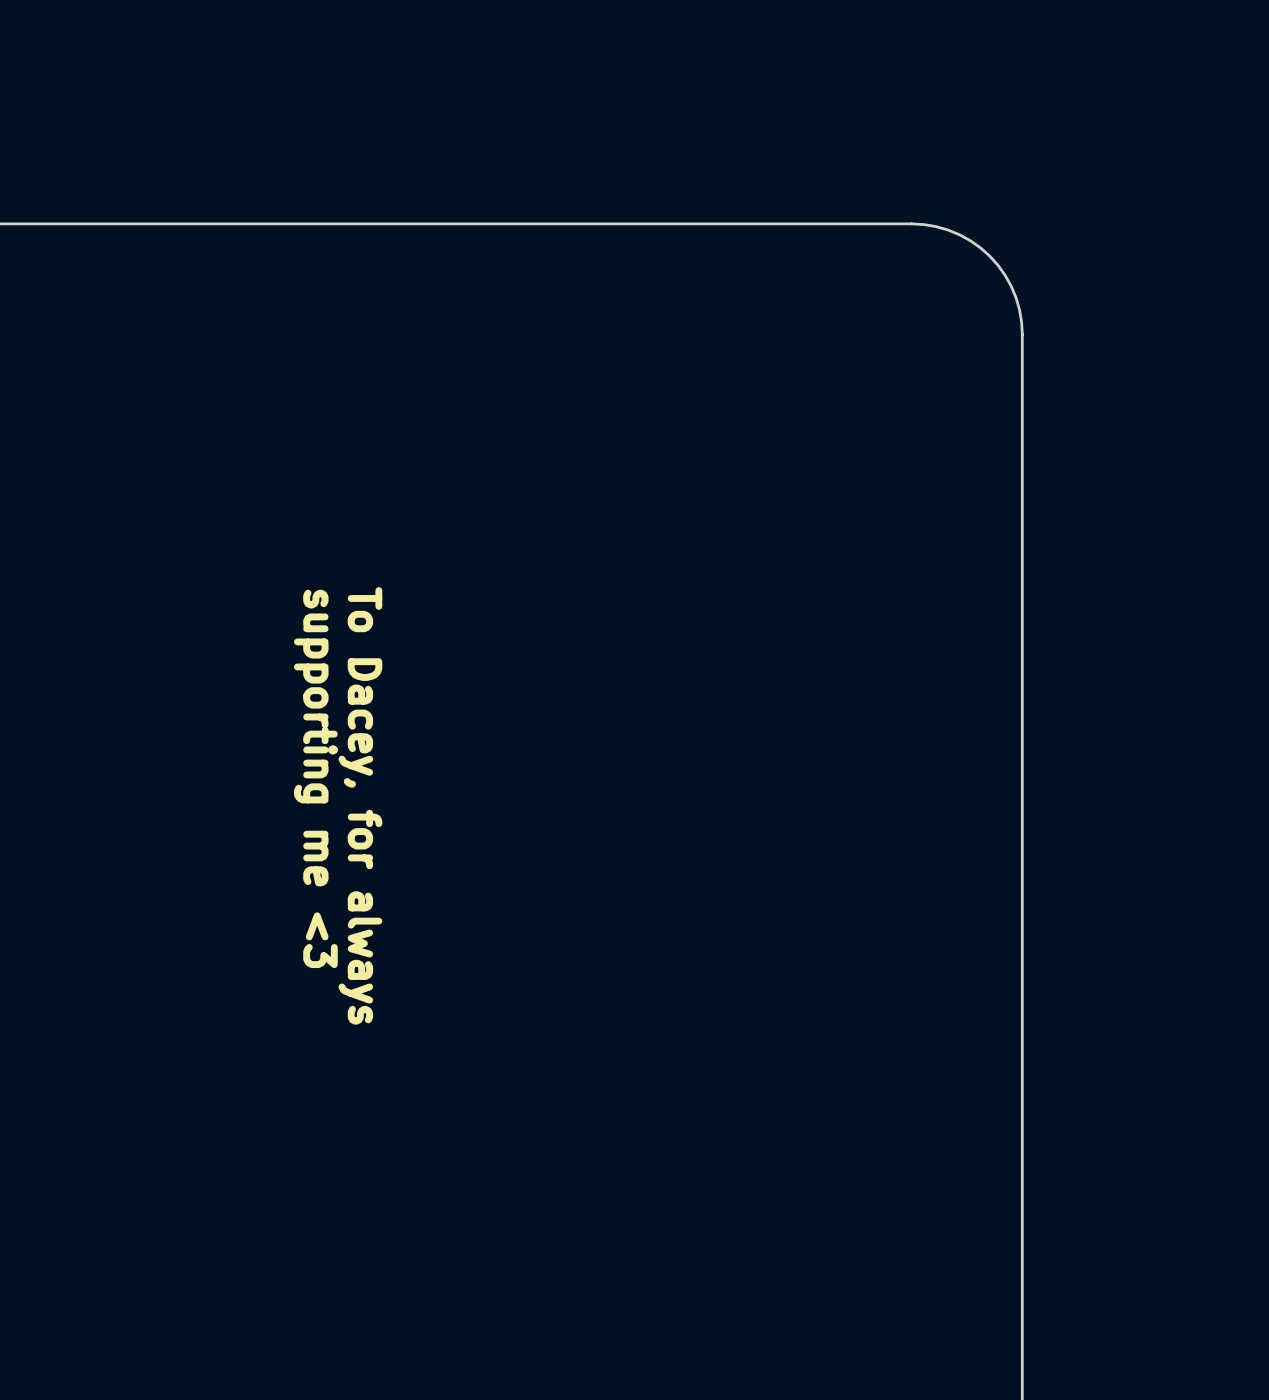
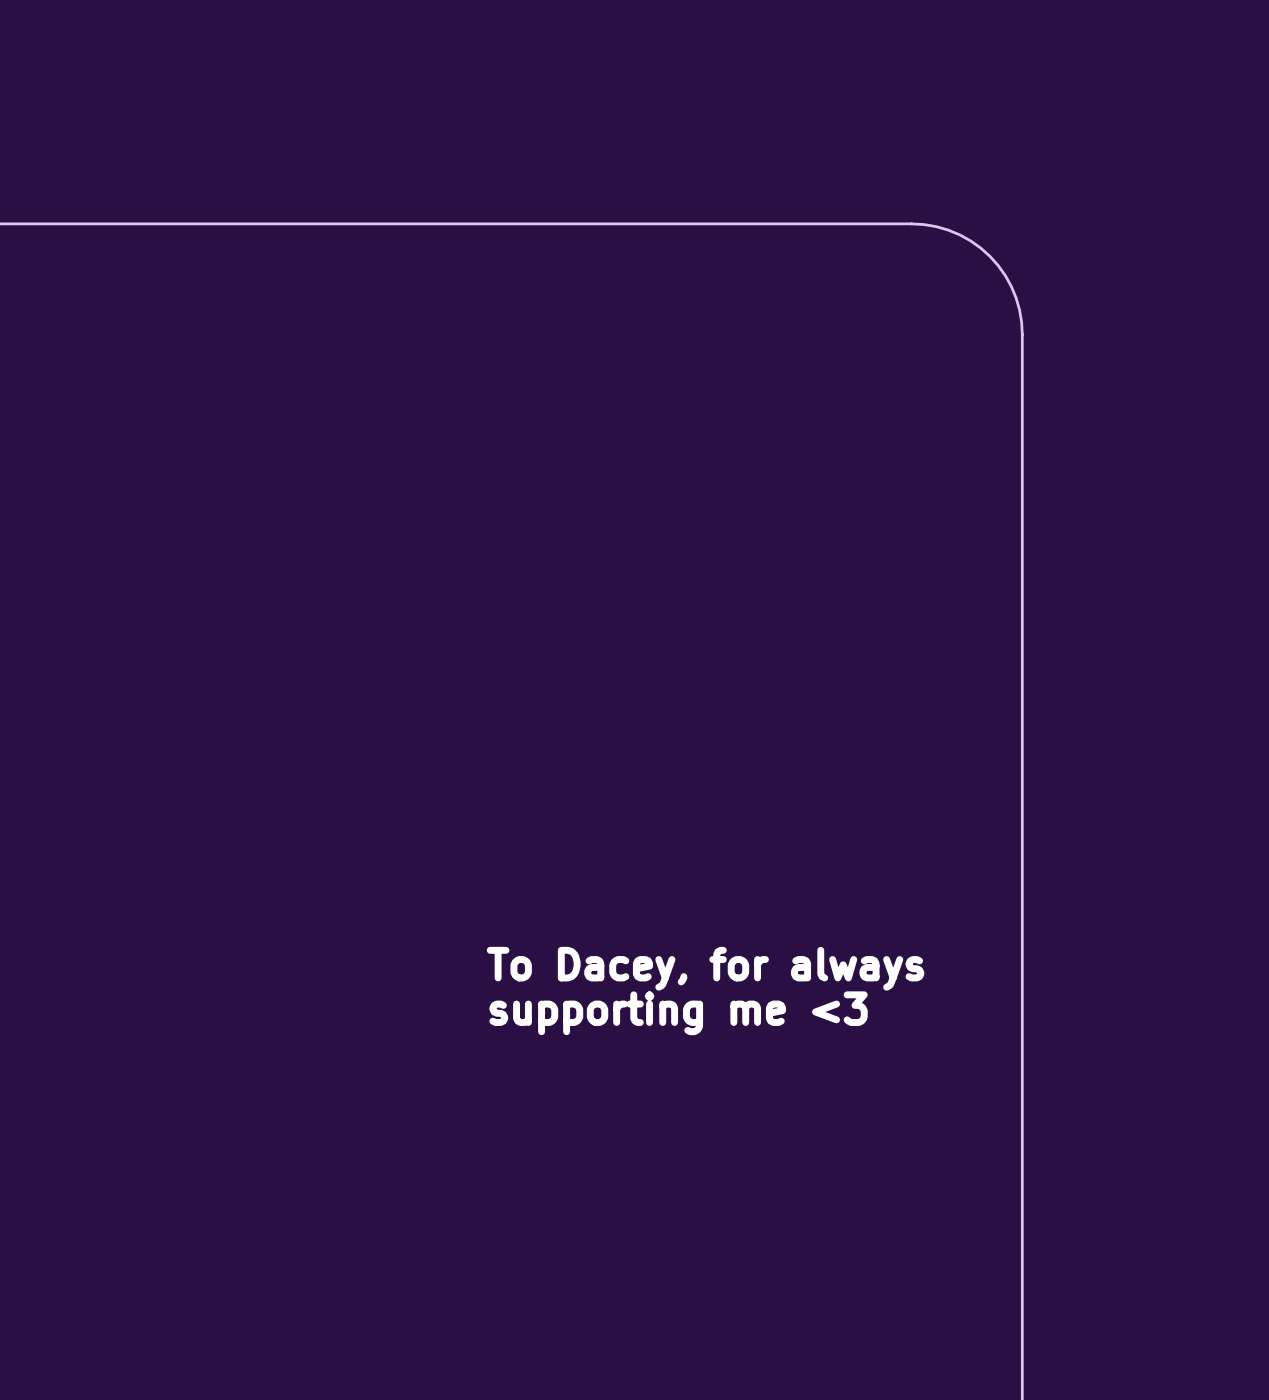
text rotation: 0° (315, 778) -> 90° counterclockwise (678, 1013)
text rotation: 0° (360, 805) -> 90° counterclockwise (705, 968)

